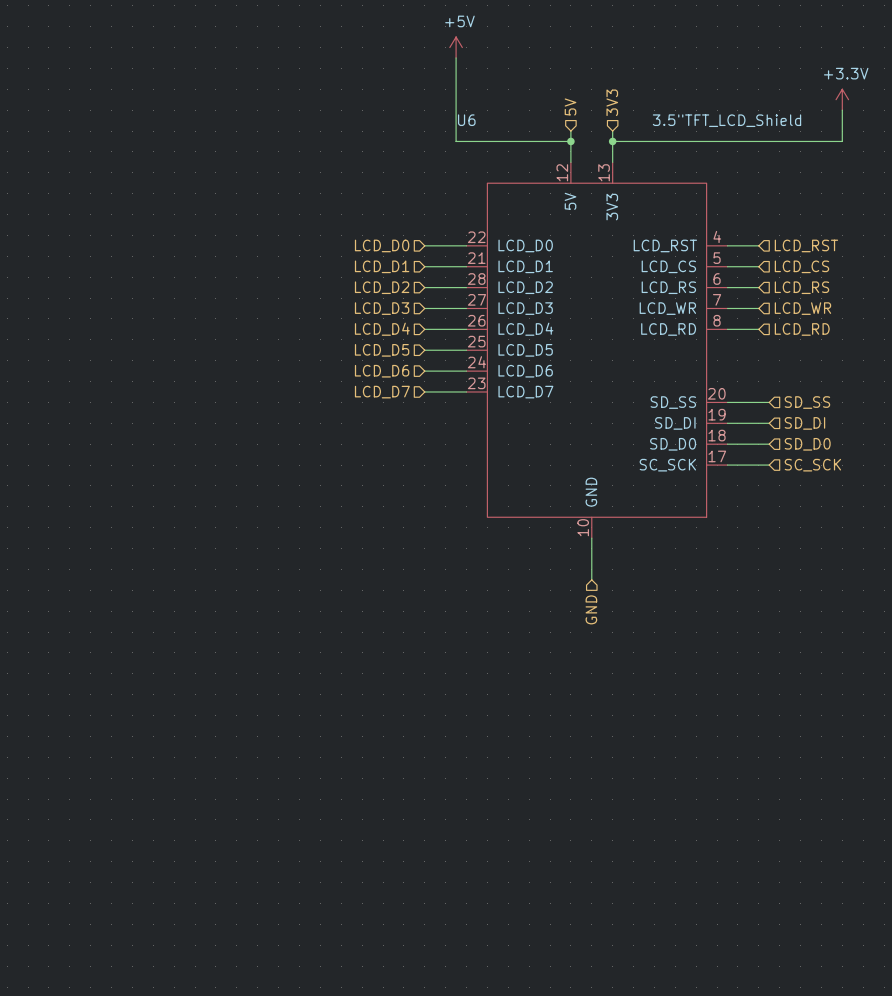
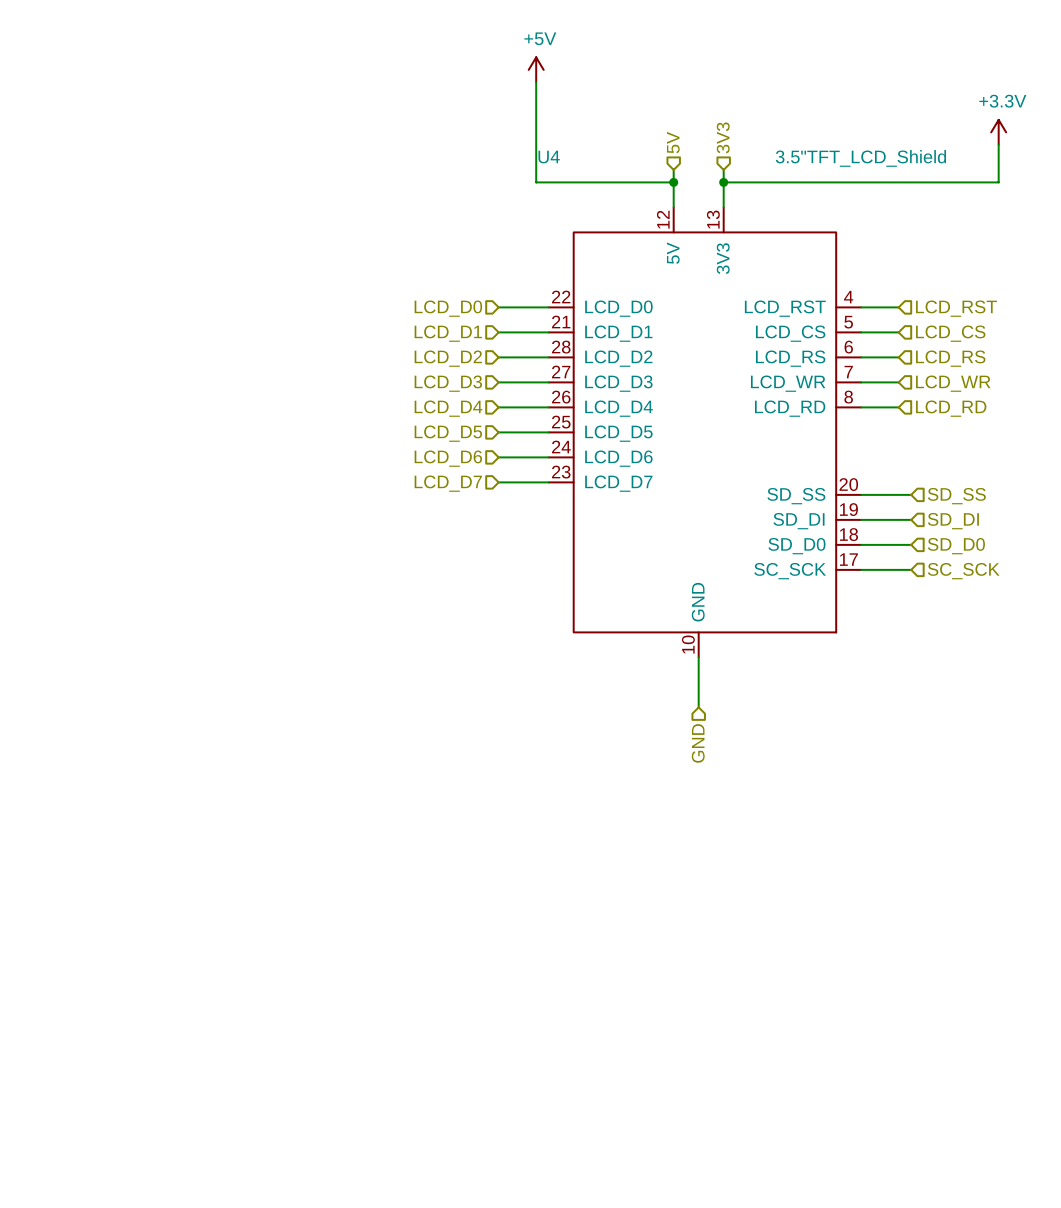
U6 name: U6 (466, 120) -> U4 (549, 157)

